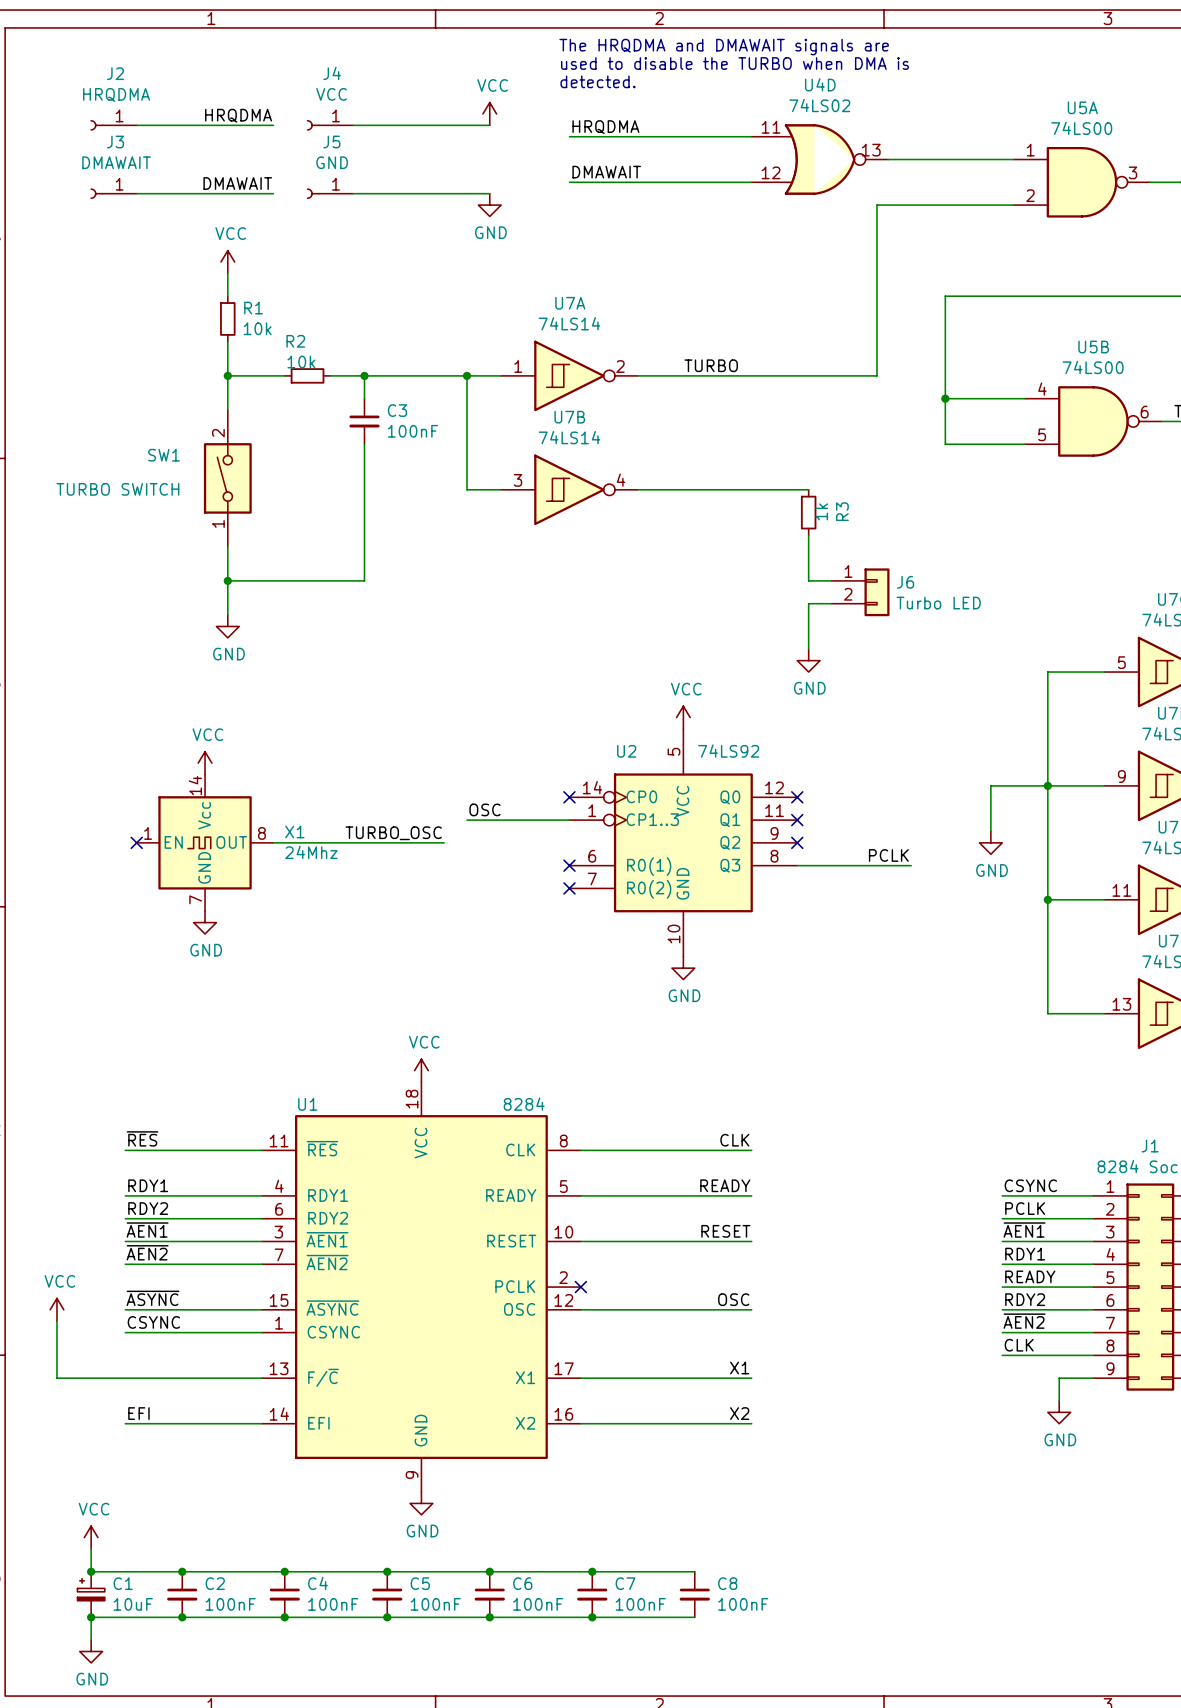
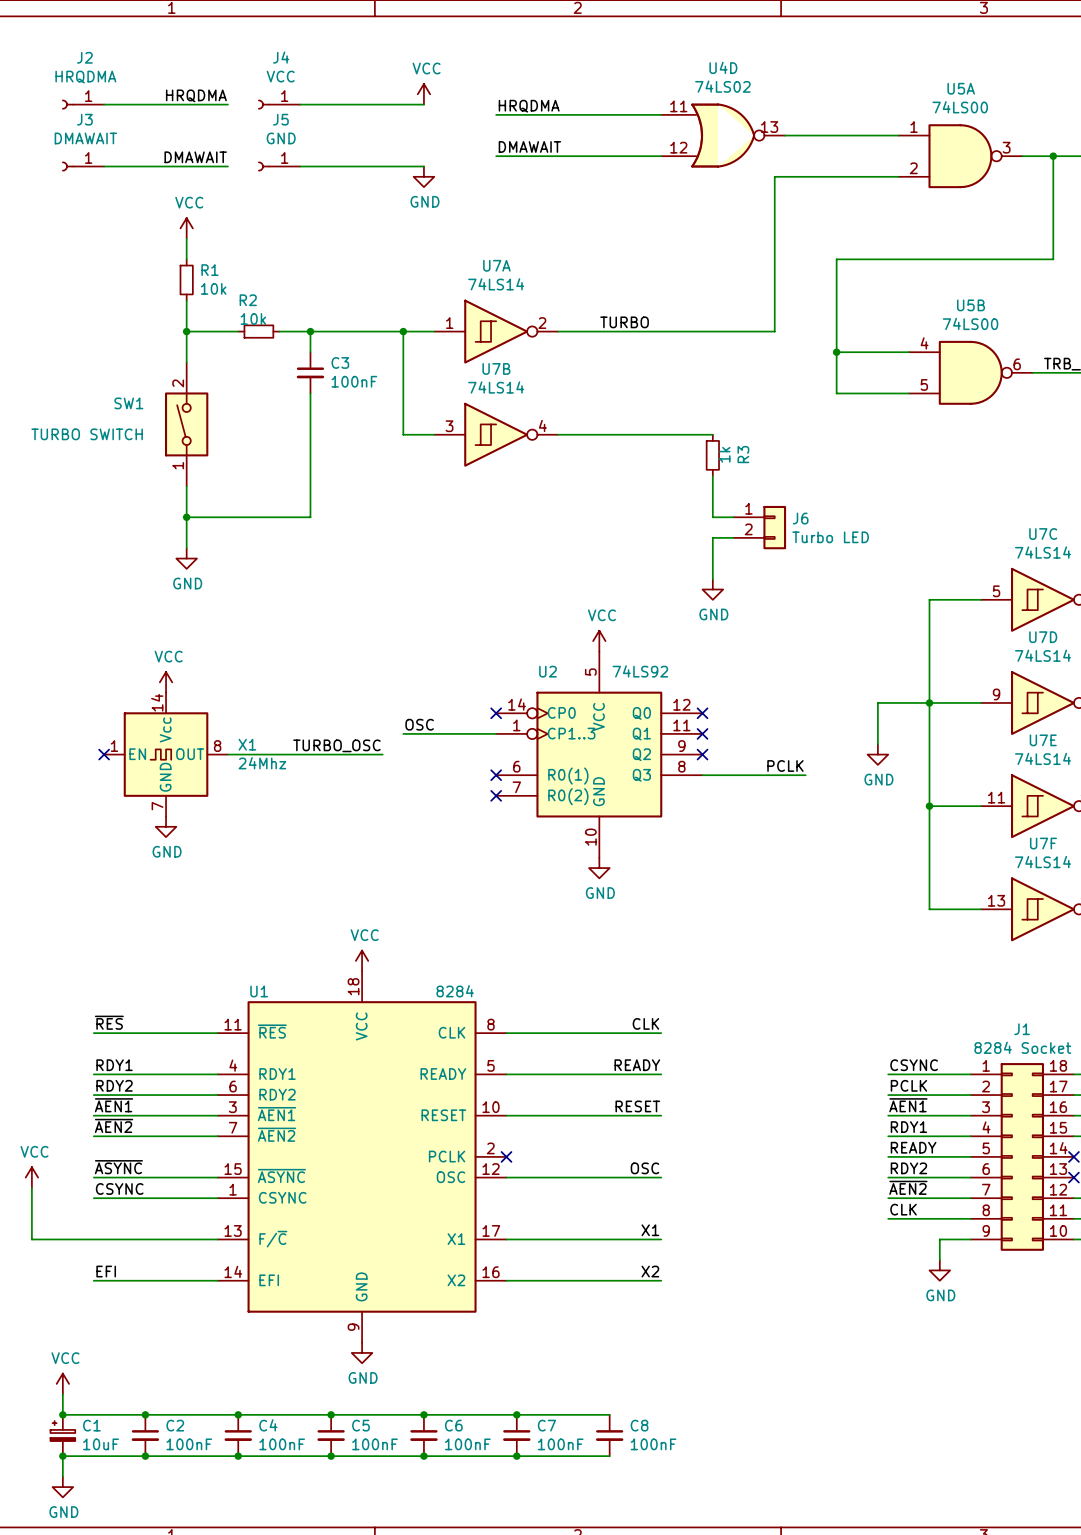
text: The HRQDMA and DMAWAIT signals are (724, 47) -> none
text: used to disable the TURBO when DMA is (734, 63) -> none
text: detected. (598, 81) -> none

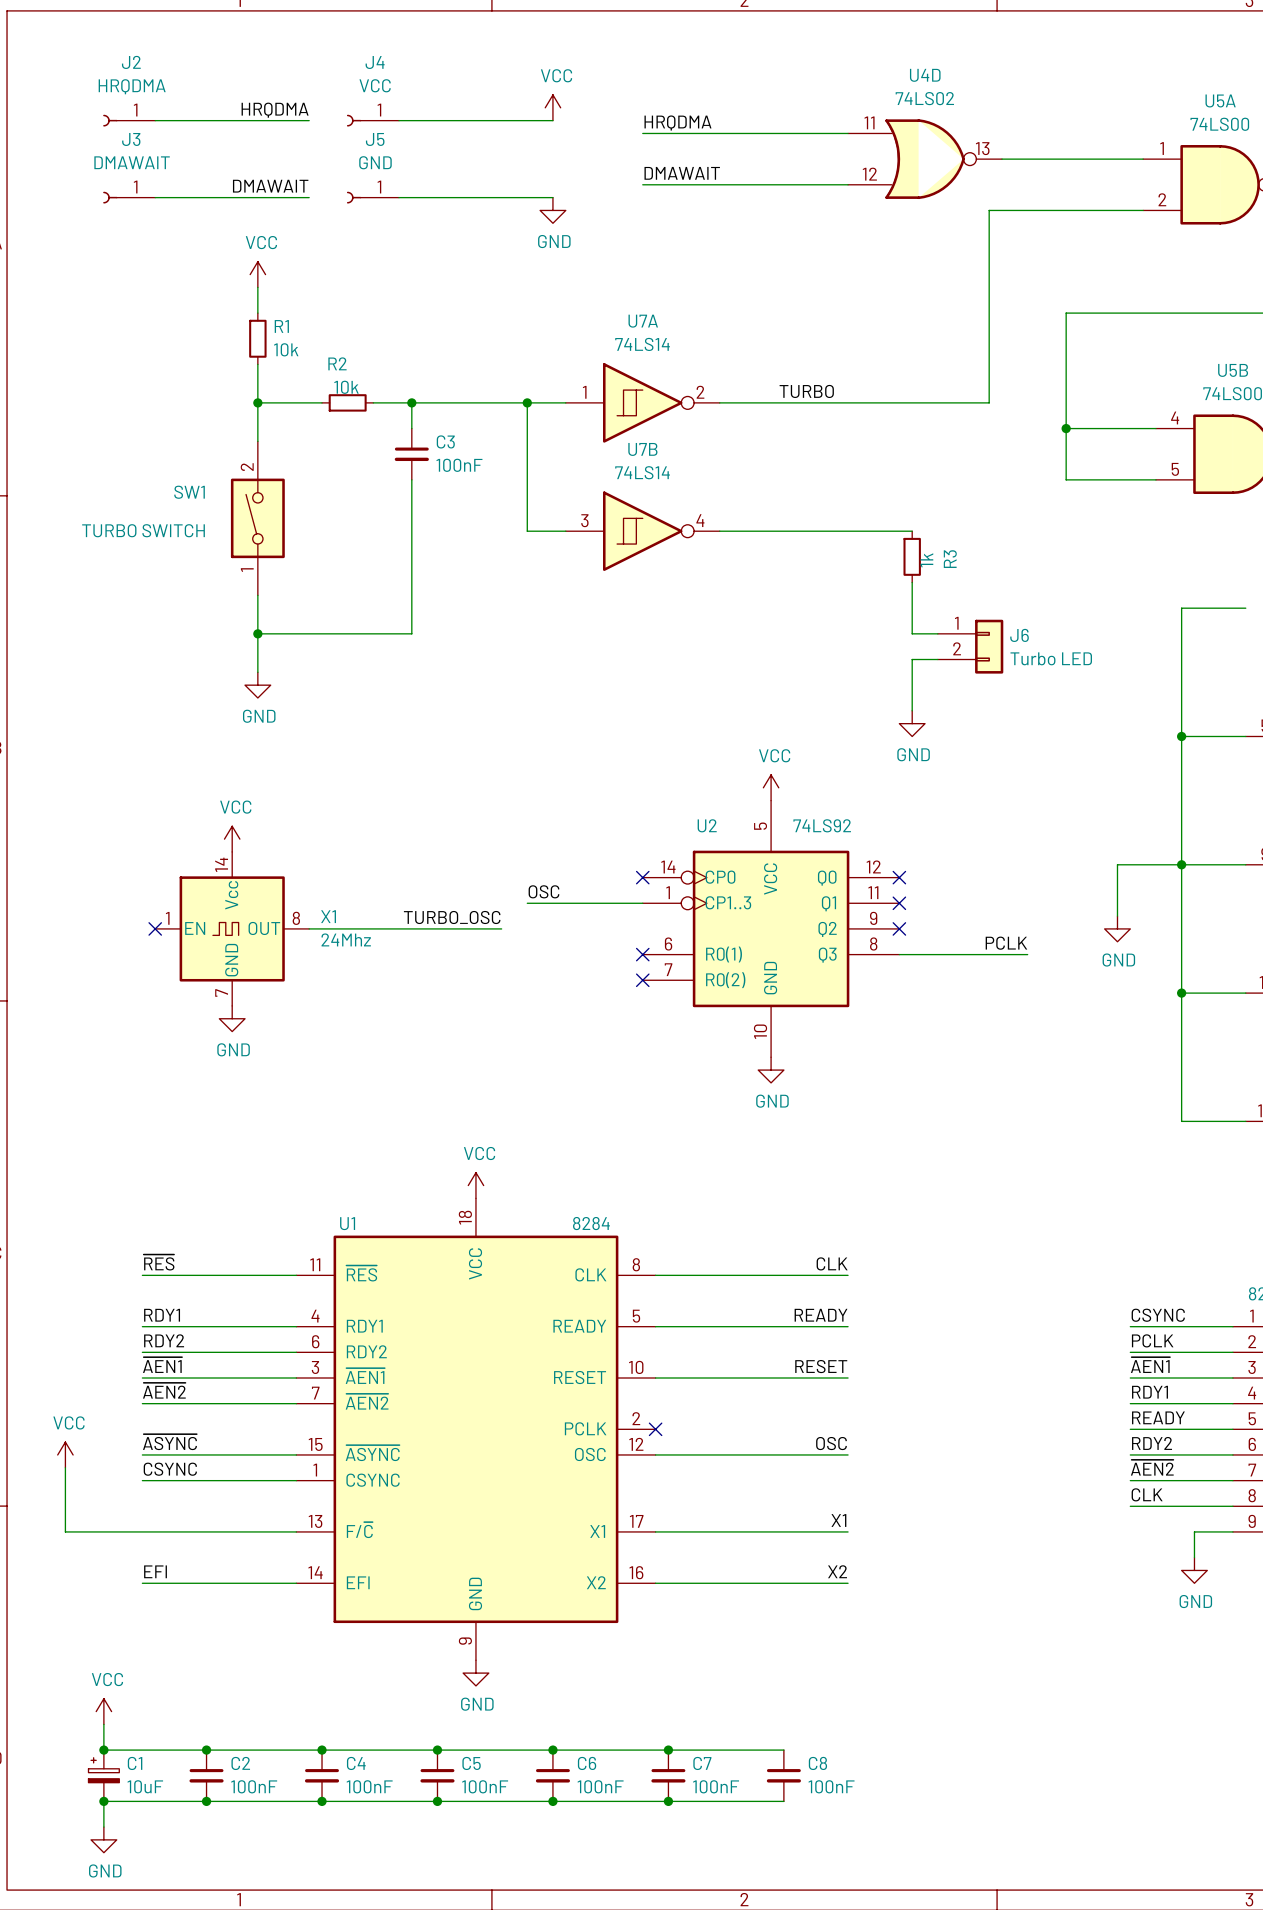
wire: none -> (1245, 608) (1181, 608) (1181, 736)
junction: none -> (1181, 736)

